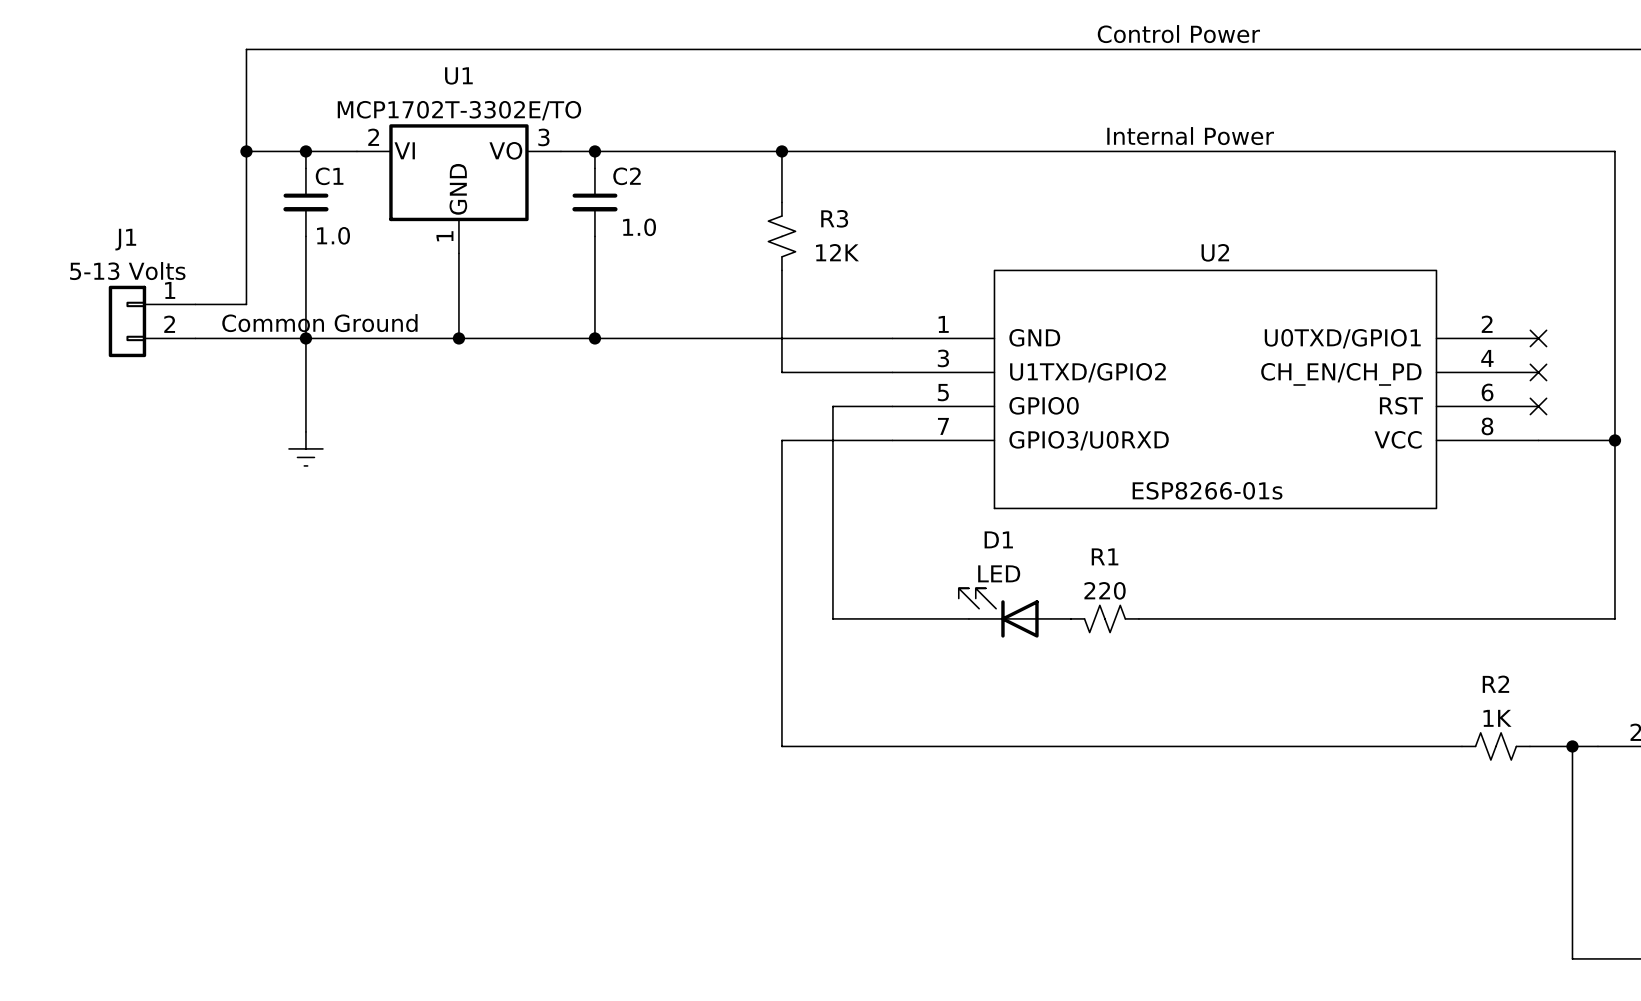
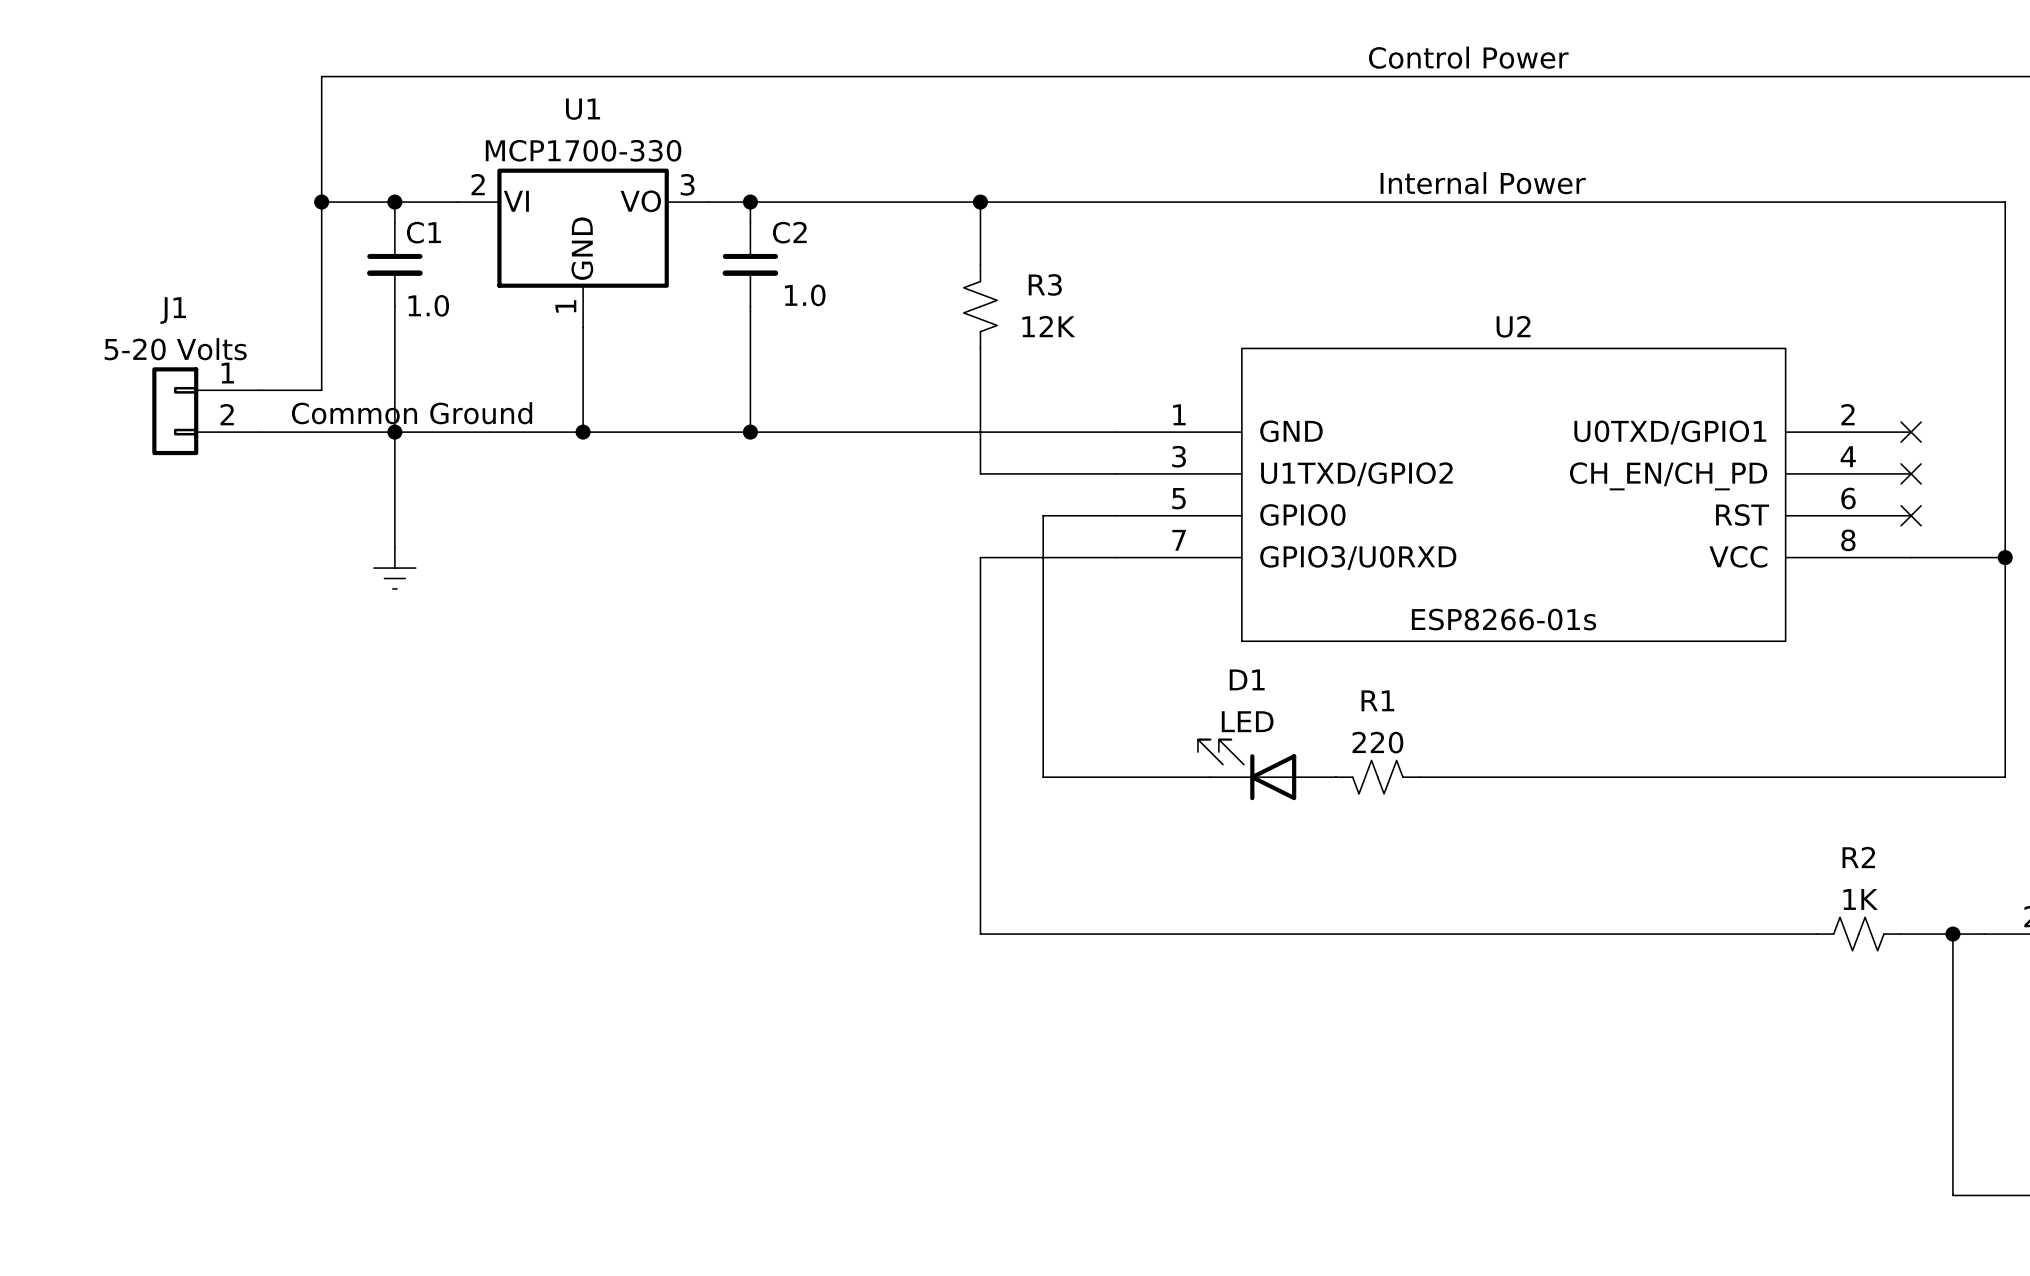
U1 value: MCP1702T-3302E/TO (459, 110) -> MCP1700-330 (583, 150)
J1 value: 5-13 Volts (127, 271) -> 5-20 Volts (175, 349)

